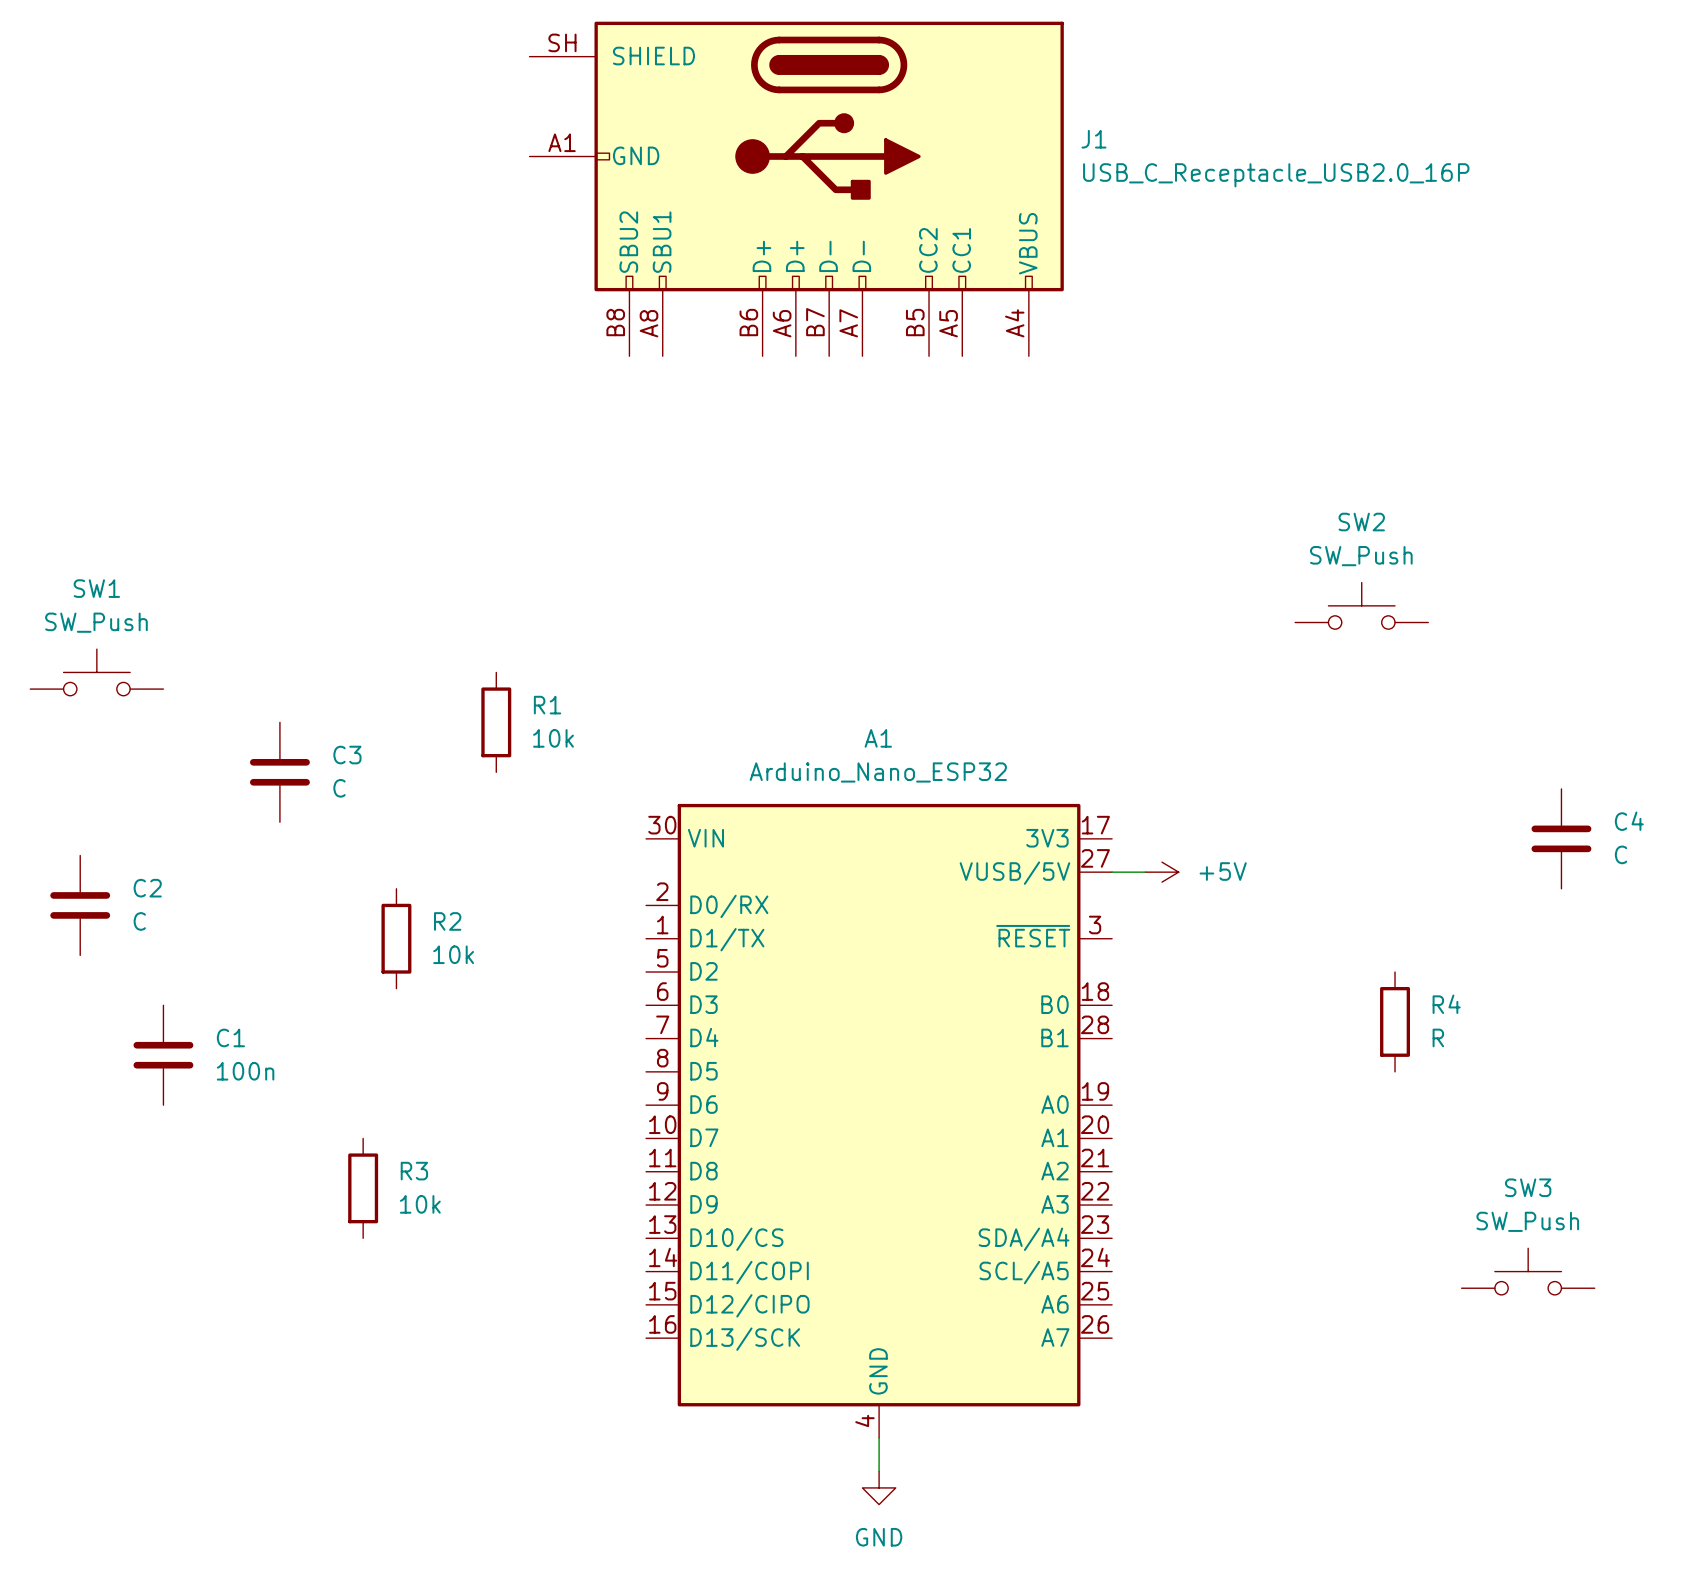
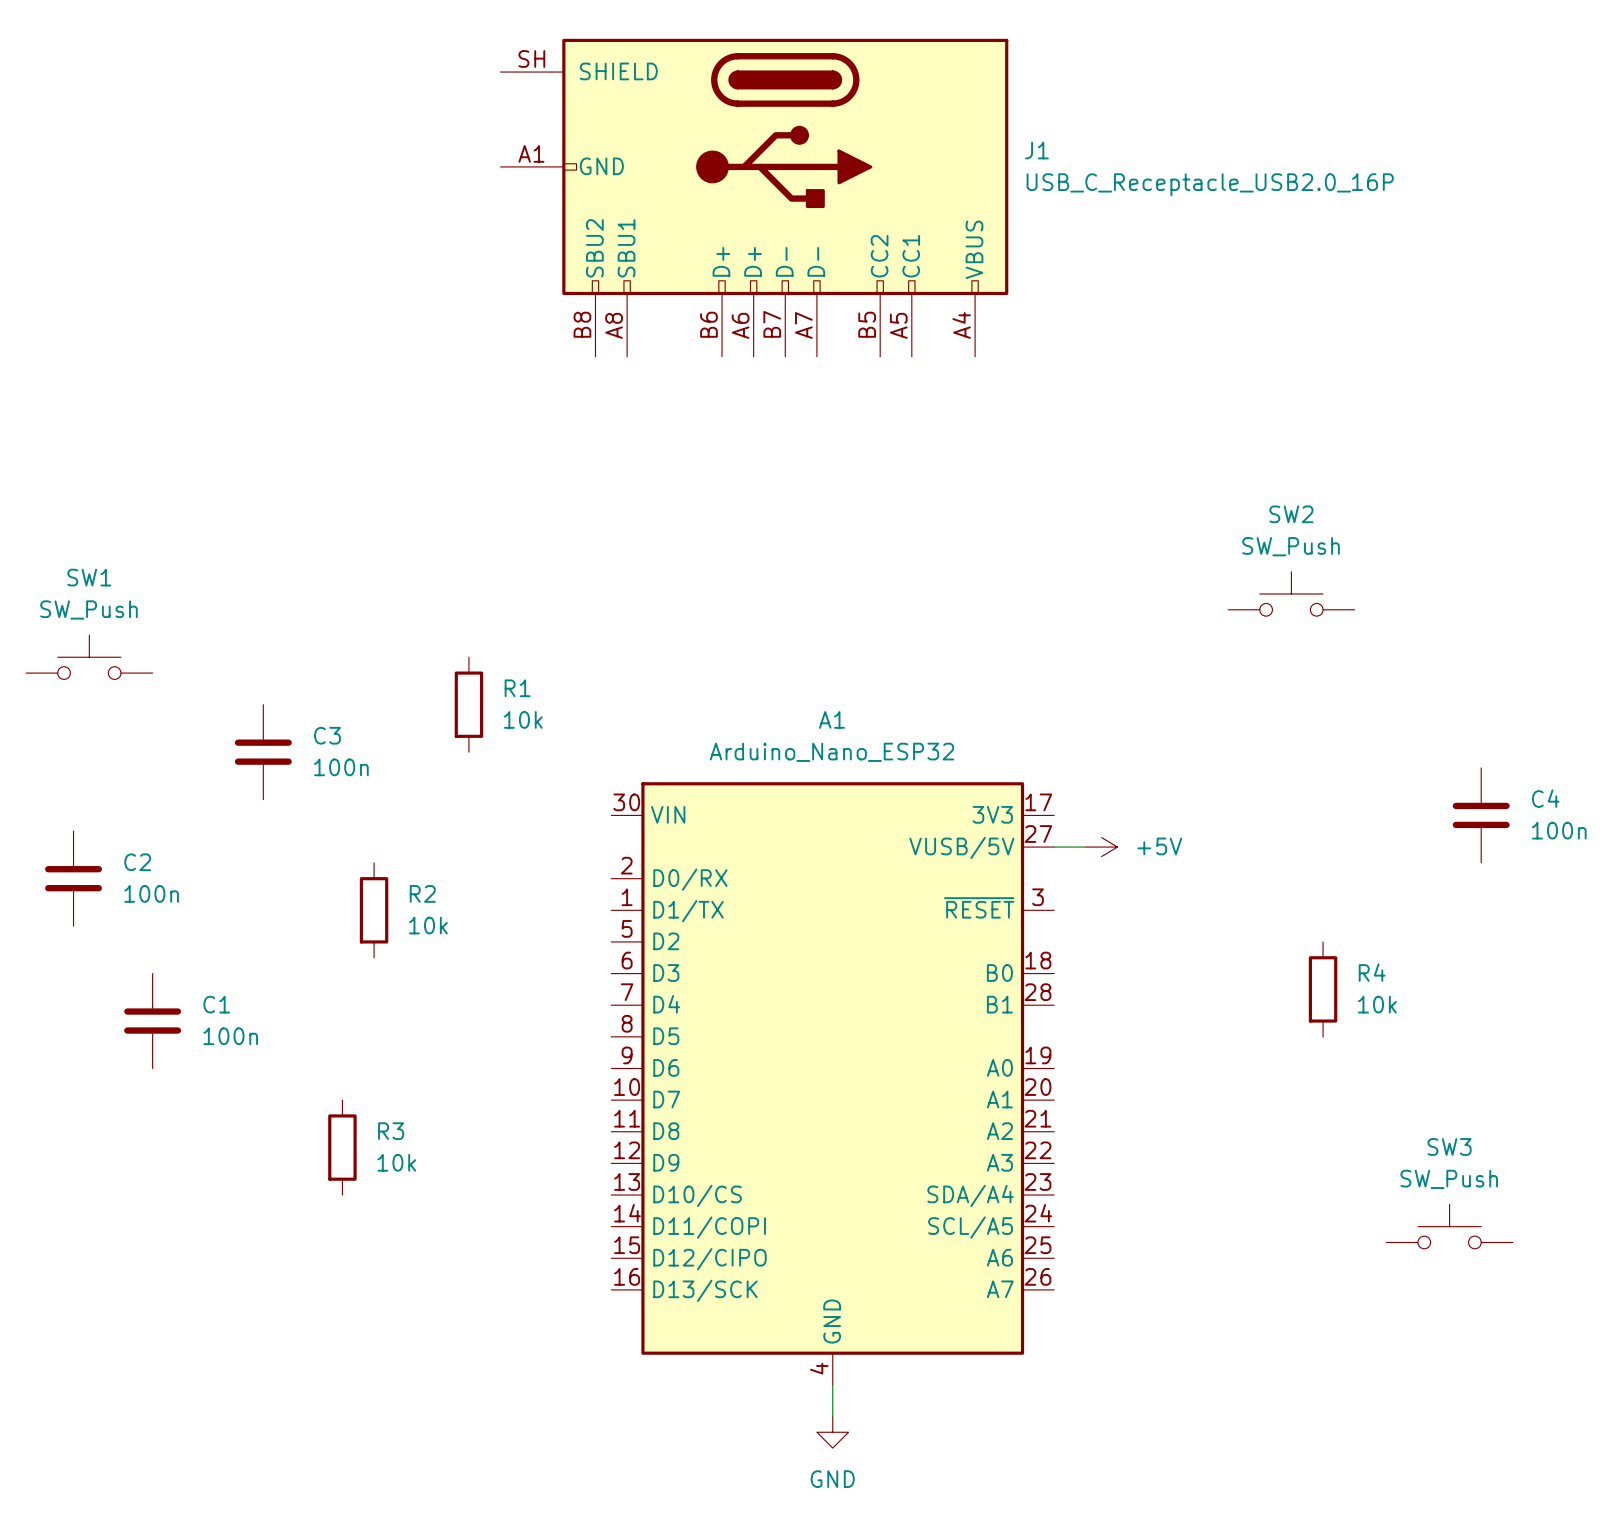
C3 value: C (339, 788) -> 100n (341, 767)
C4 value: C (1621, 854) -> 100n (1559, 830)
C2 value: C (139, 921) -> 100n (151, 893)
R4 value: R (1438, 1037) -> 10k (1377, 1004)

